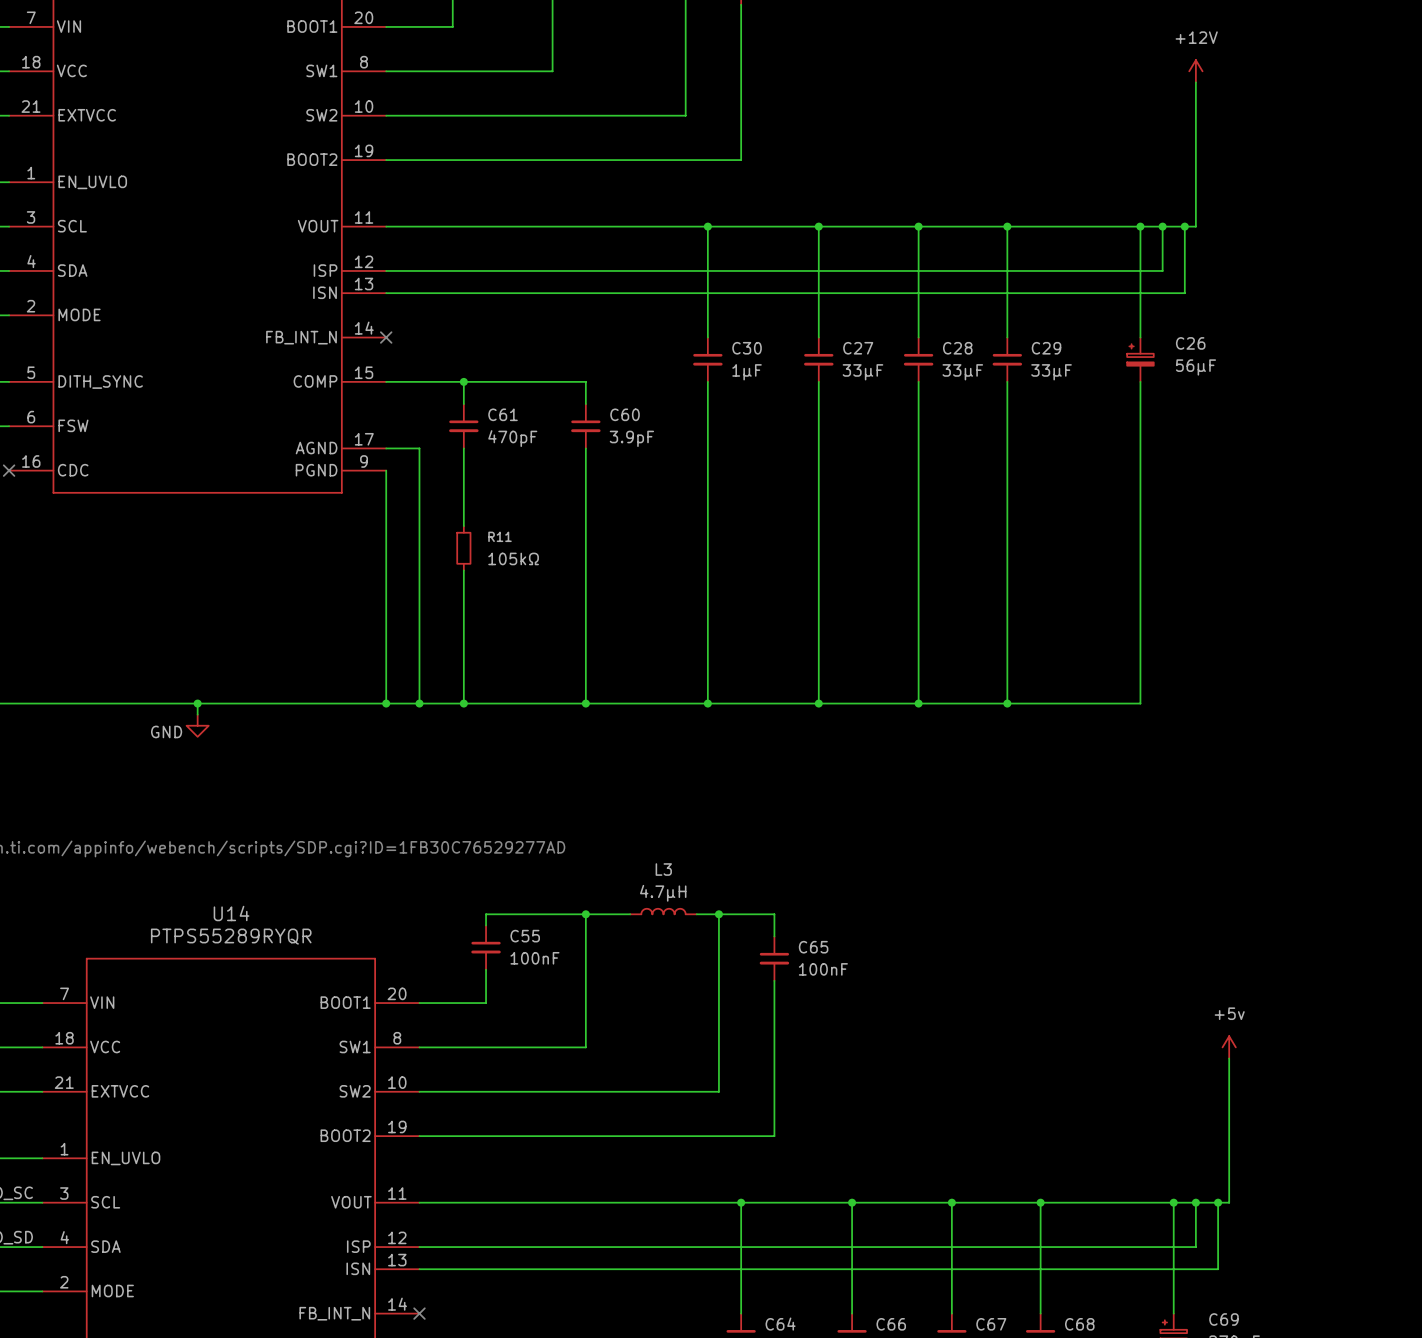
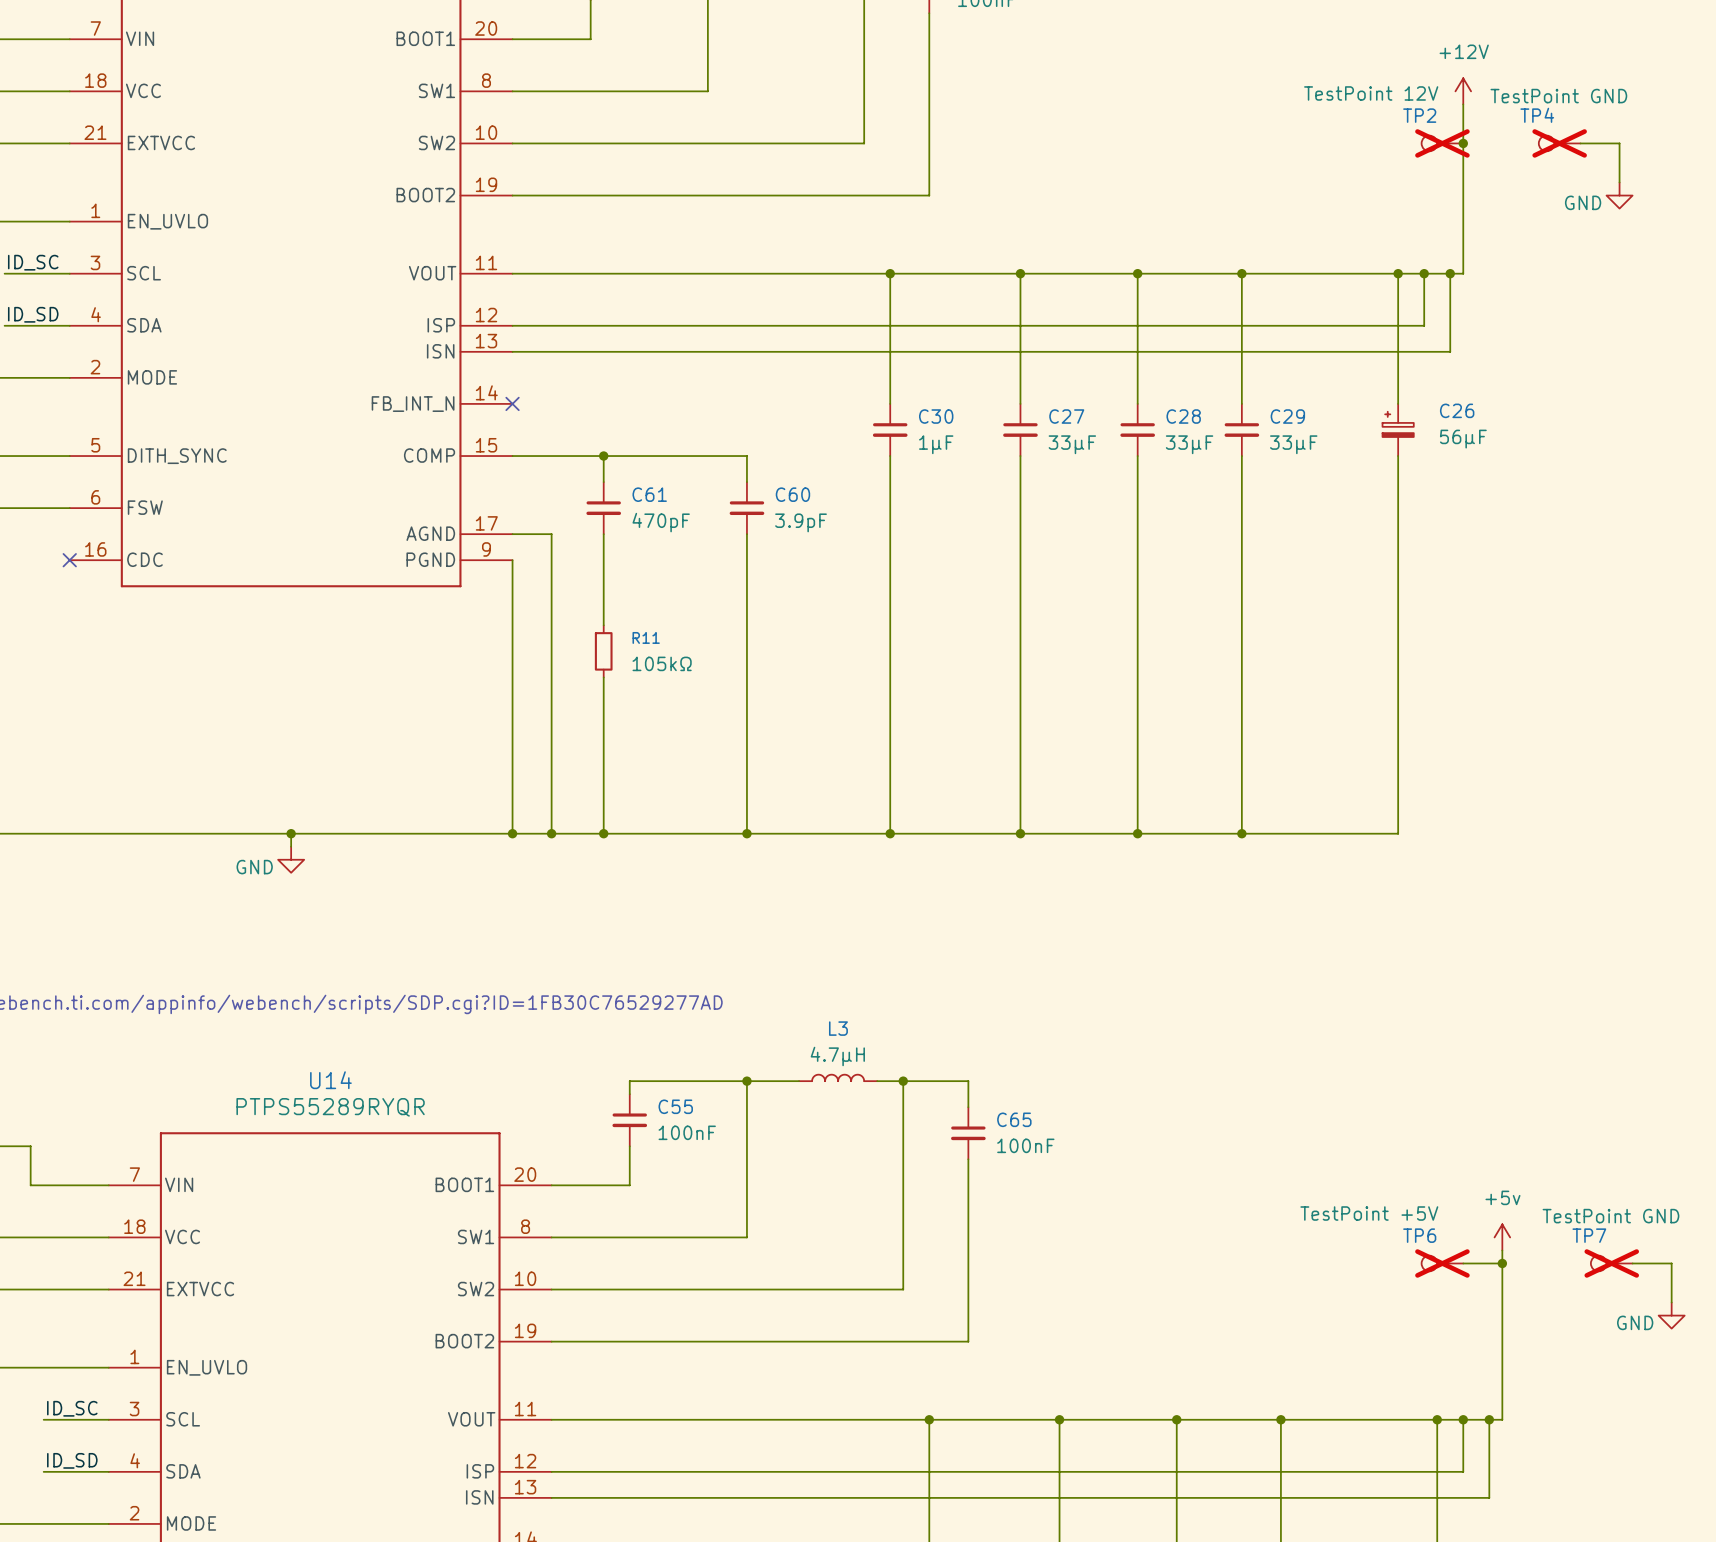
TP2: none -> TestPoint 12V (1442, 143)
junction: none -> (1463, 143)
TP4: none -> TestPoint GND (1559, 143)
wire: none -> (1580, 143) (1619, 143) (1619, 182)
power symbol: none -> GND (1619, 195)
TP6: none -> TestPoint +5V (1442, 1263)
wire: none -> (1463, 1263) (1502, 1263)
junction: none -> (1502, 1263)
TP7: none -> TestPoint GND (1611, 1263)
wire: none -> (1632, 1263) (1671, 1263) (1671, 1302)
power symbol: none -> GND (1671, 1315)

